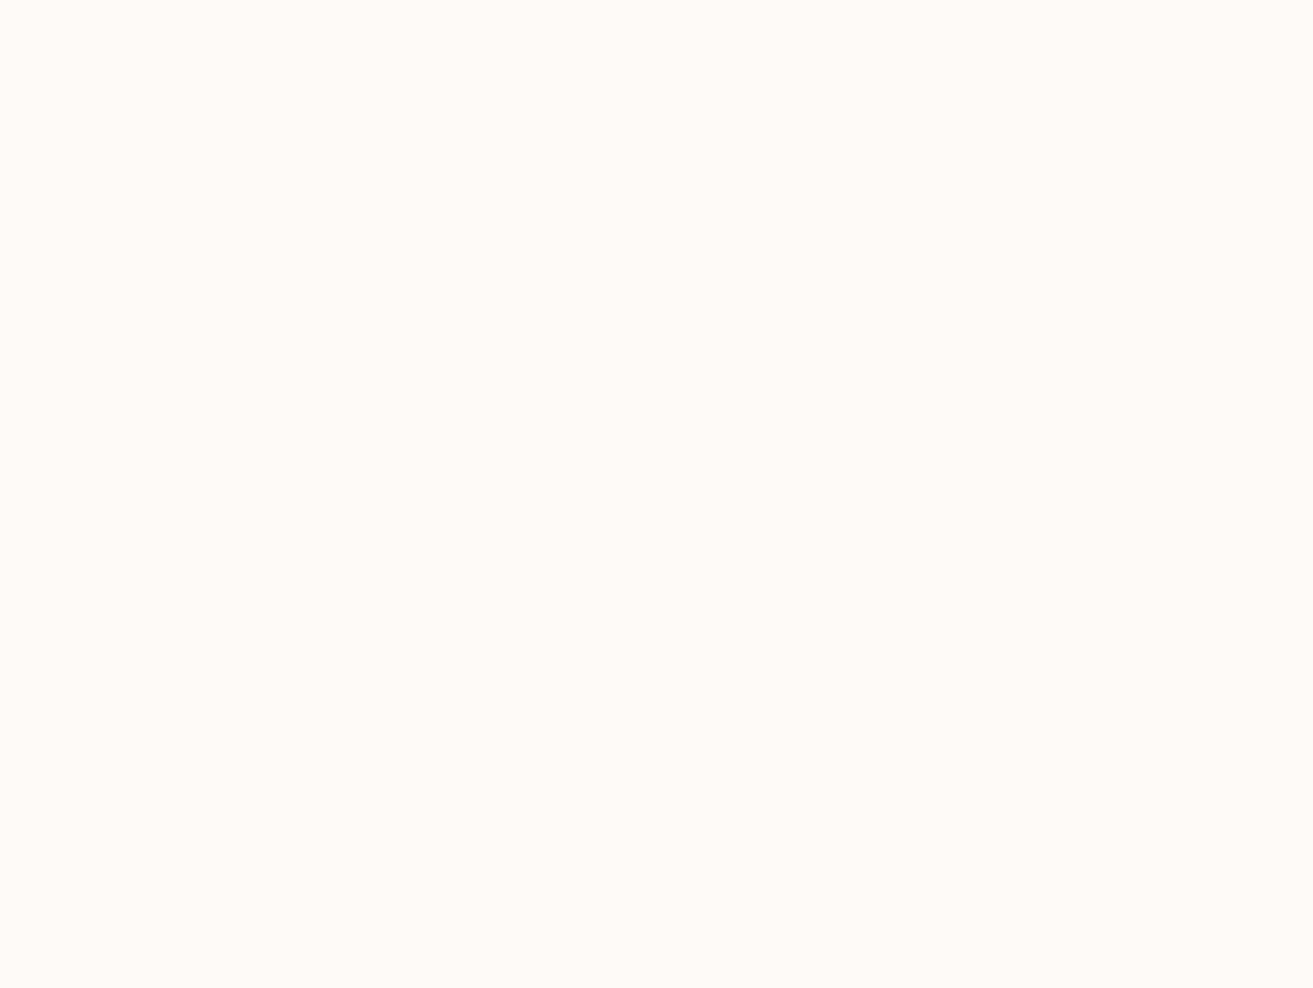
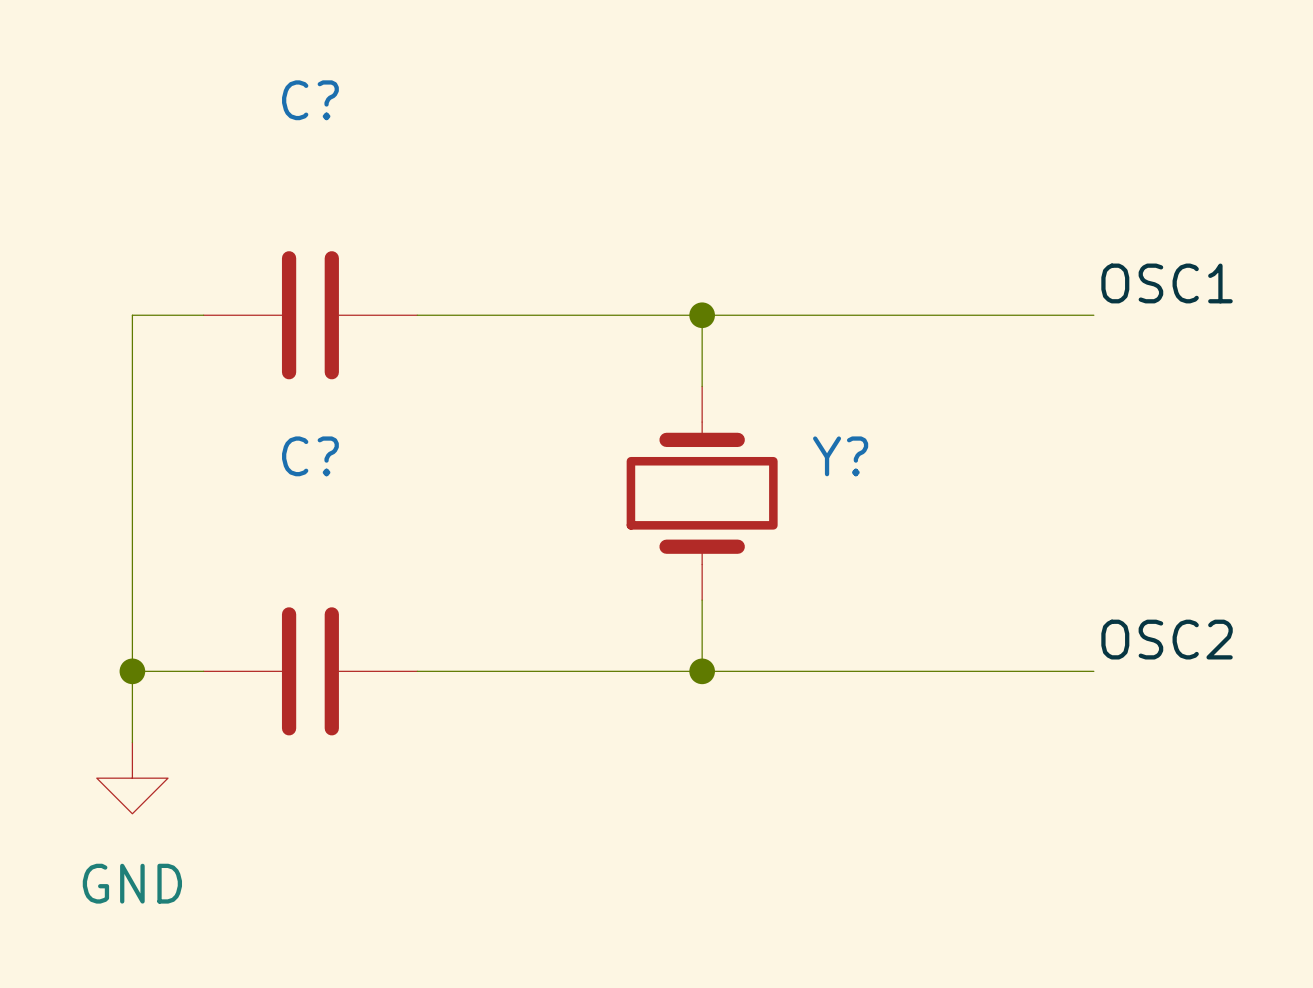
label: none -> OSC1 (1167, 283)
wire: none -> (203, 315) (132, 315) (132, 742)
C?: none -> (310, 315)
wire: none -> (417, 315) (1093, 315)
wire: none -> (702, 315) (702, 386)
junction: none -> (702, 315)
Y?: none -> (702, 493)
wire: none -> (702, 600) (702, 671)
label: none -> OSC2 (1167, 639)
wire: none -> (132, 671) (203, 671)
junction: none -> (132, 671)
C?: none -> (310, 671)
wire: none -> (417, 671) (1093, 671)
junction: none -> (702, 671)
power symbol: none -> GND (132, 778)

